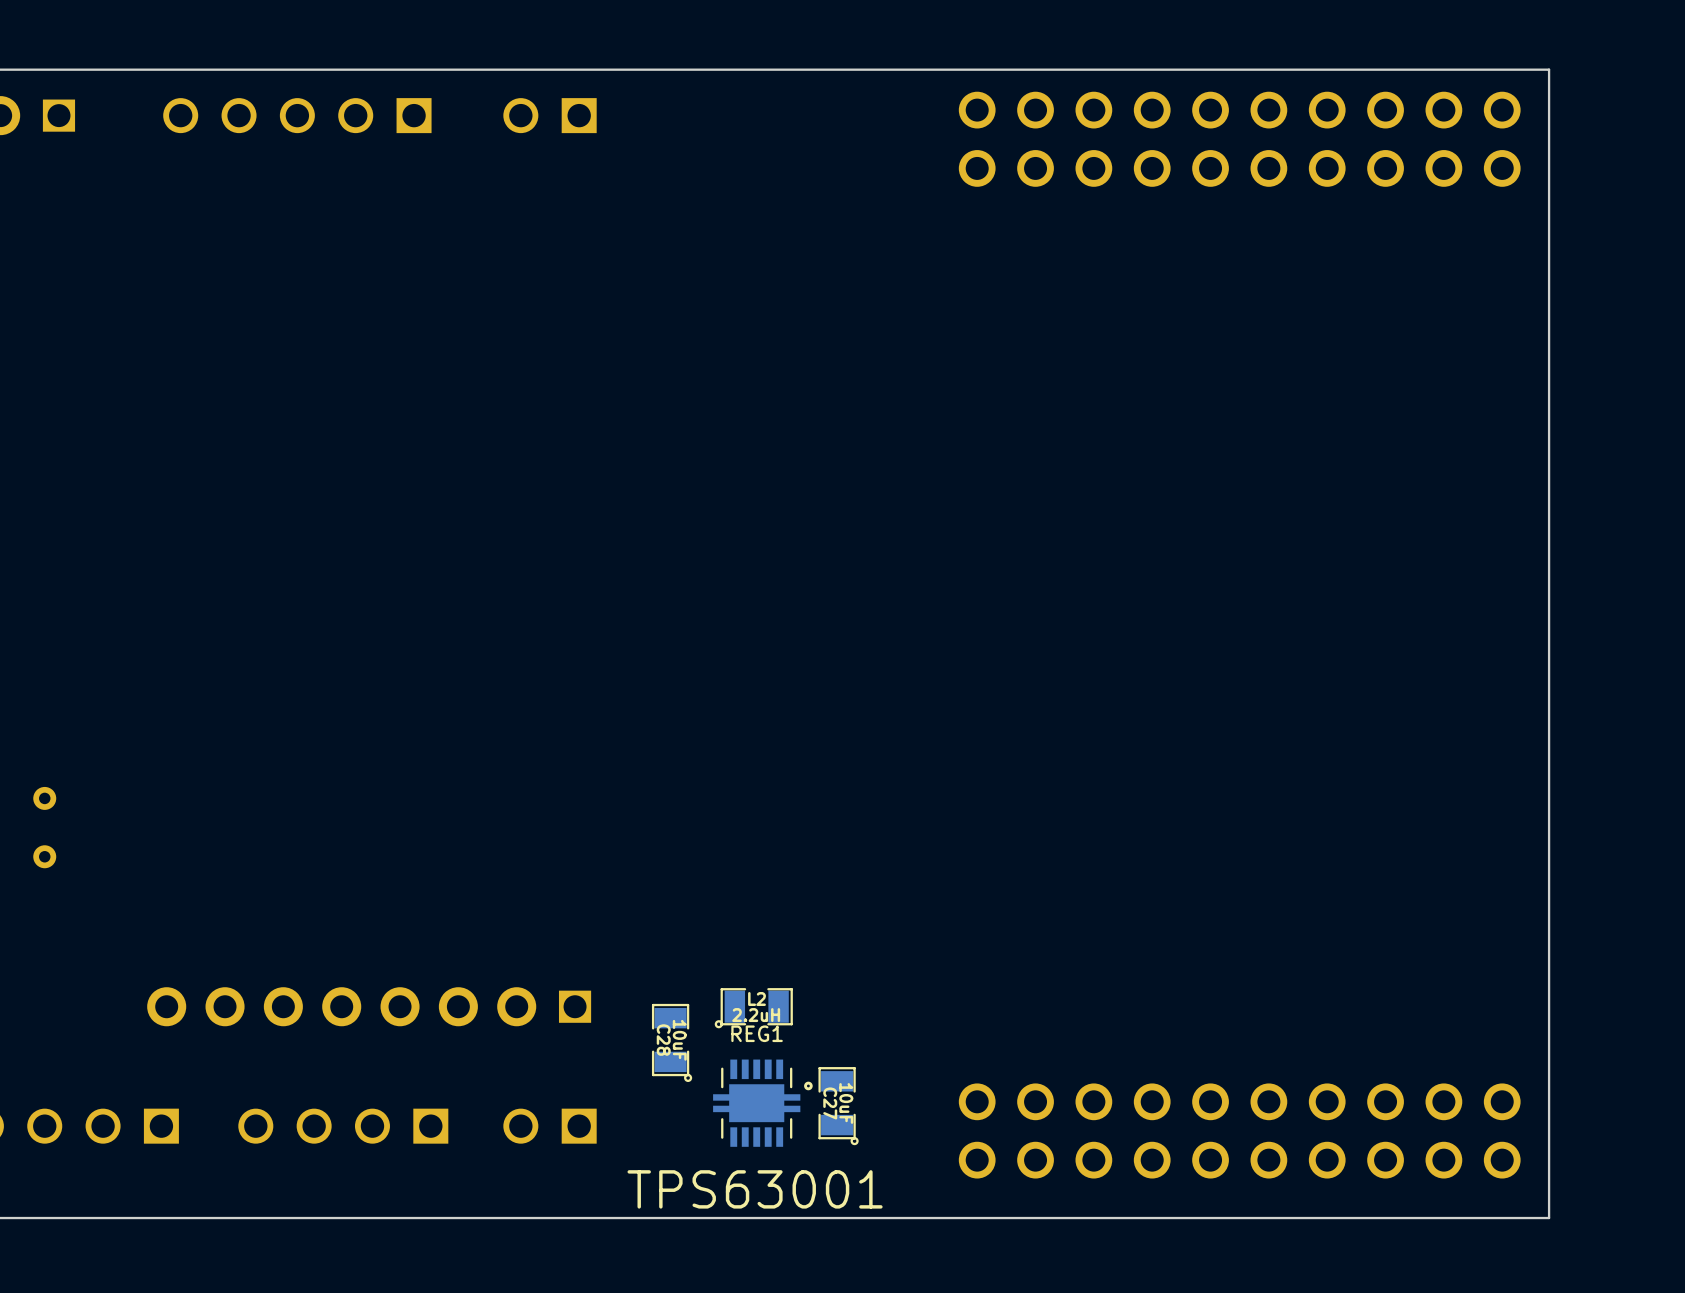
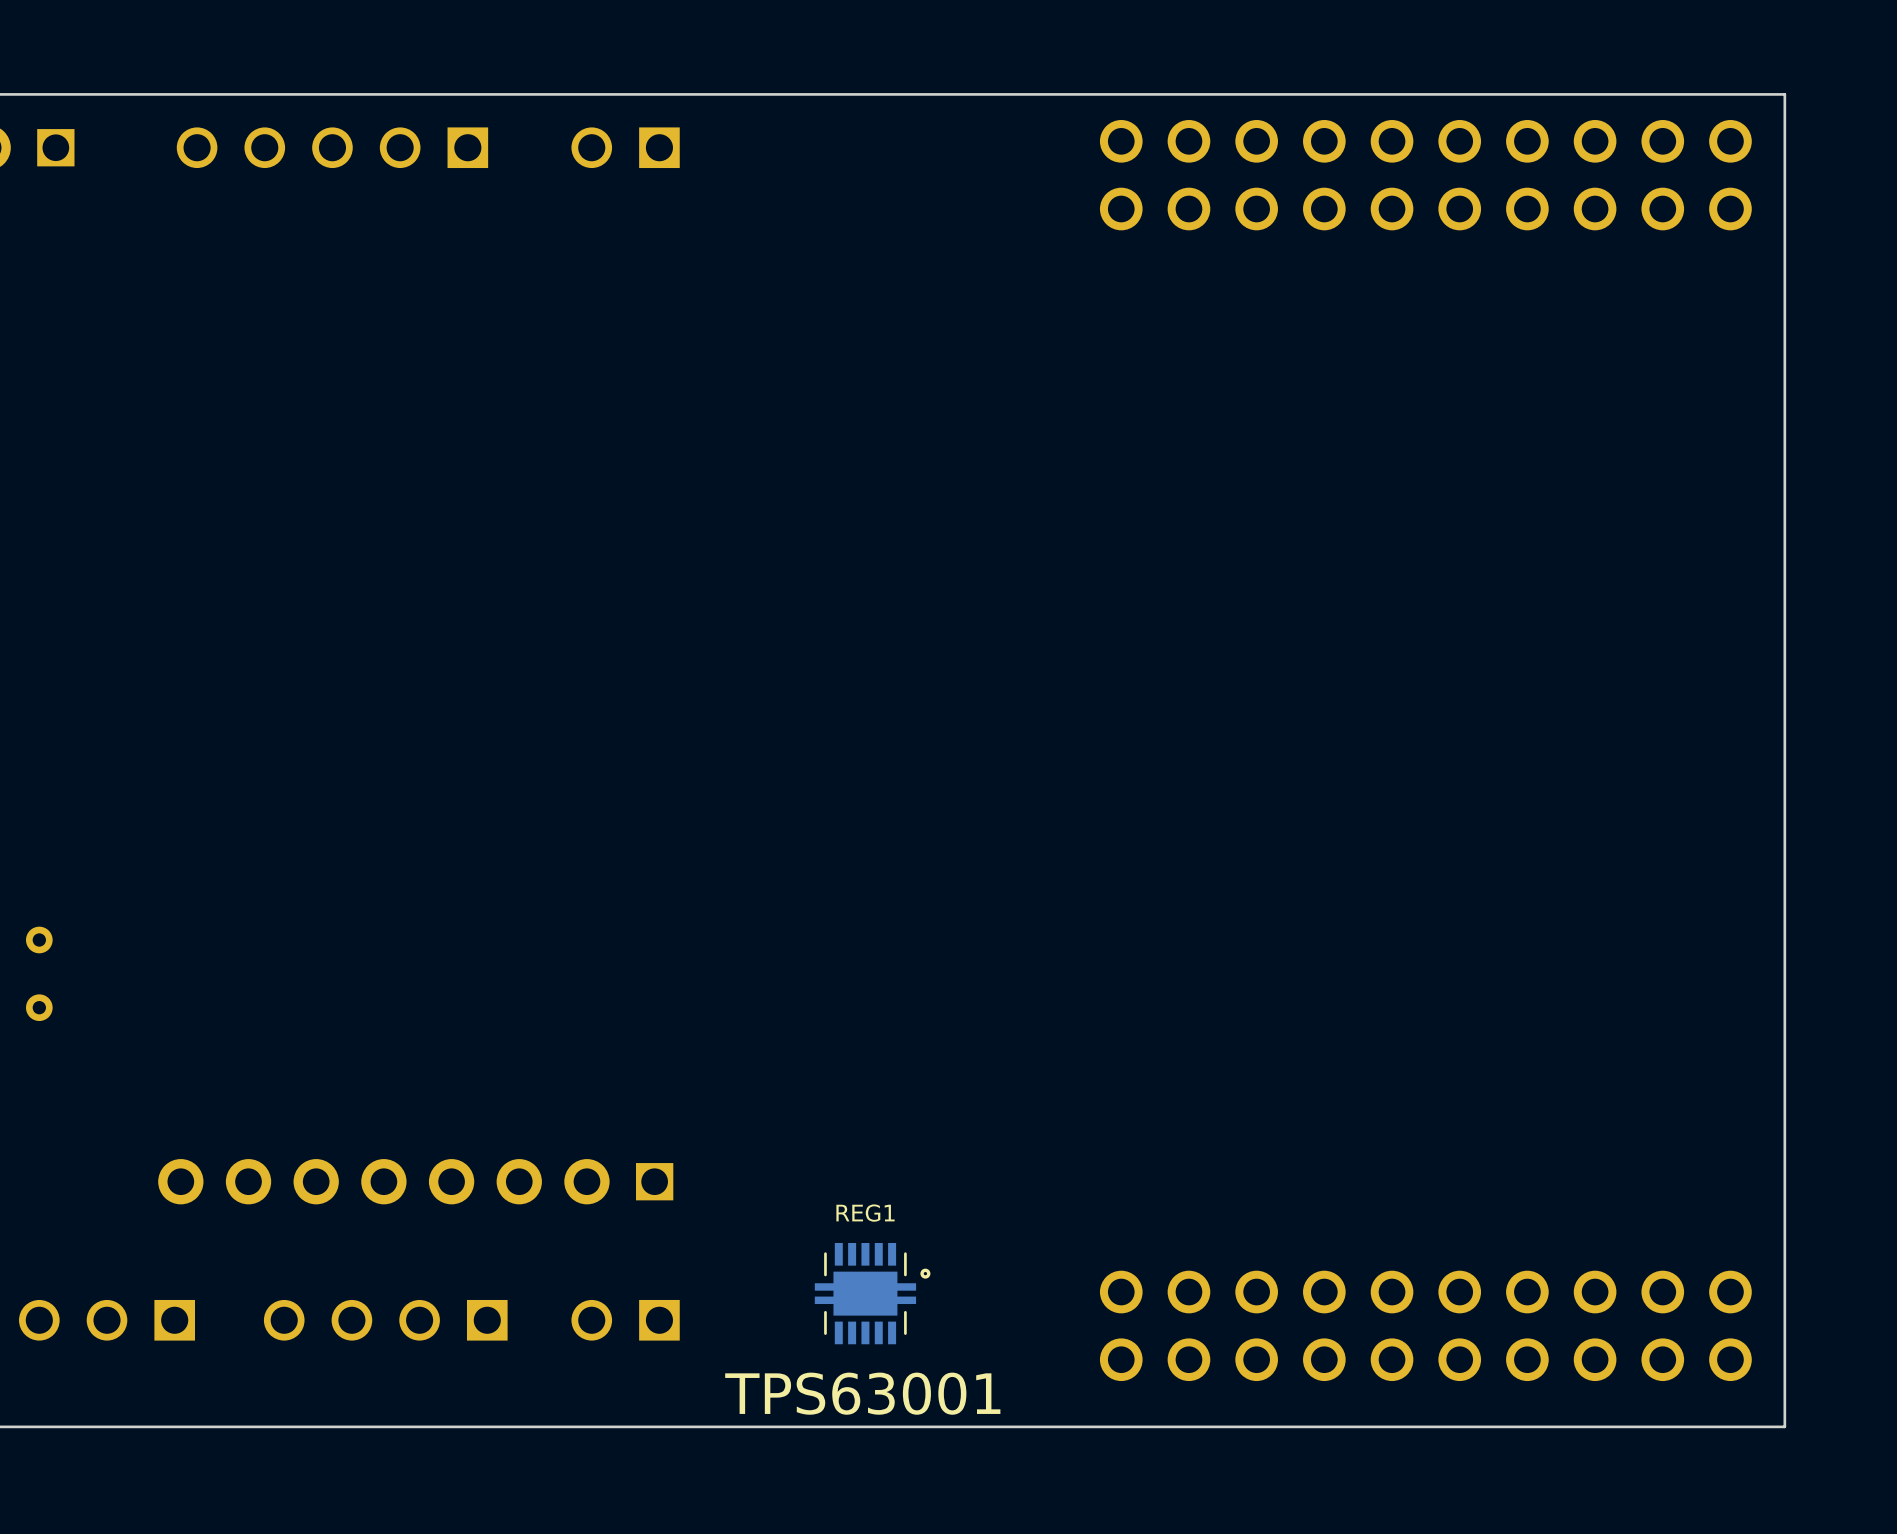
L2: 2.2uH (753, 1008) -> none
C28: 10uF (672, 1042) -> none
C27: 10uF (838, 1106) -> none

